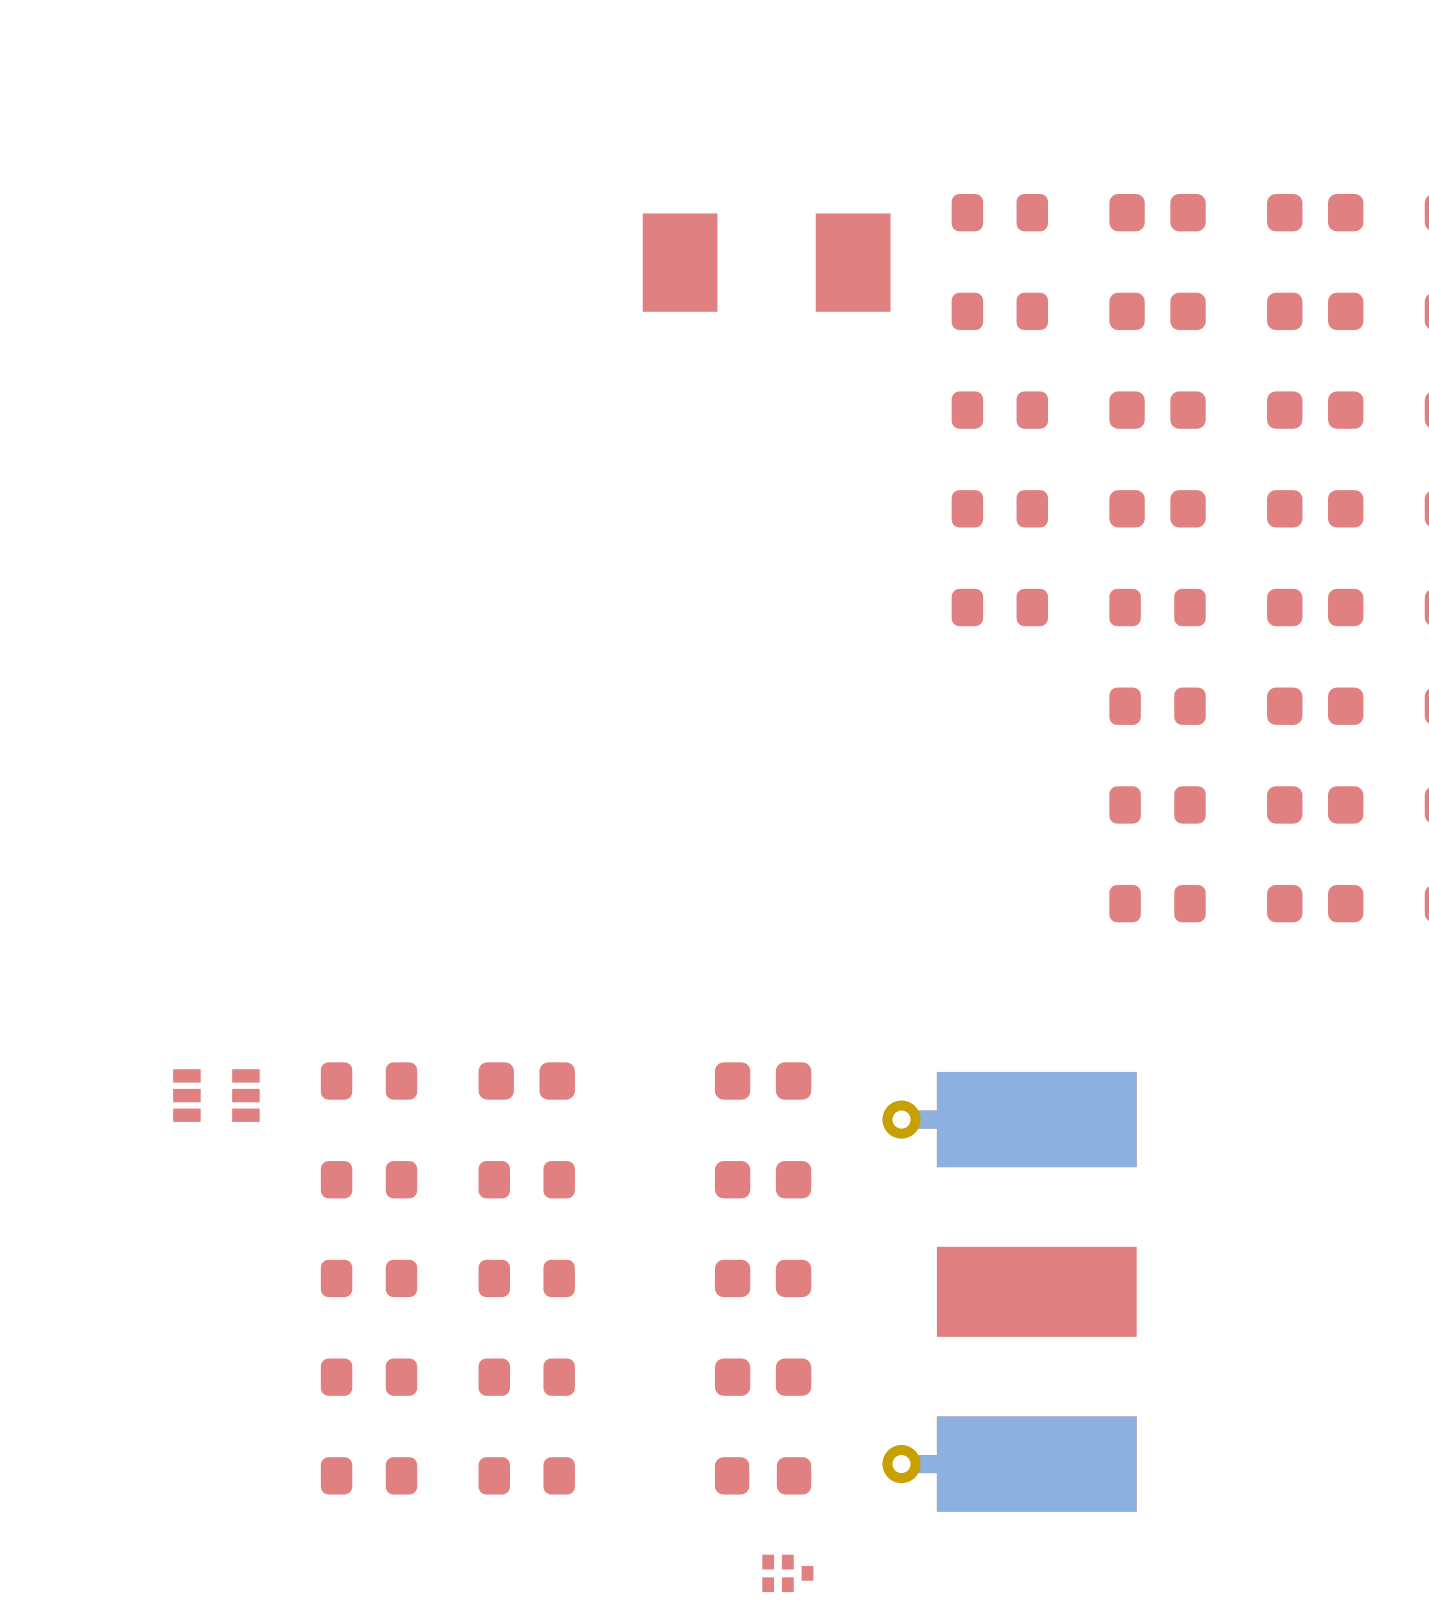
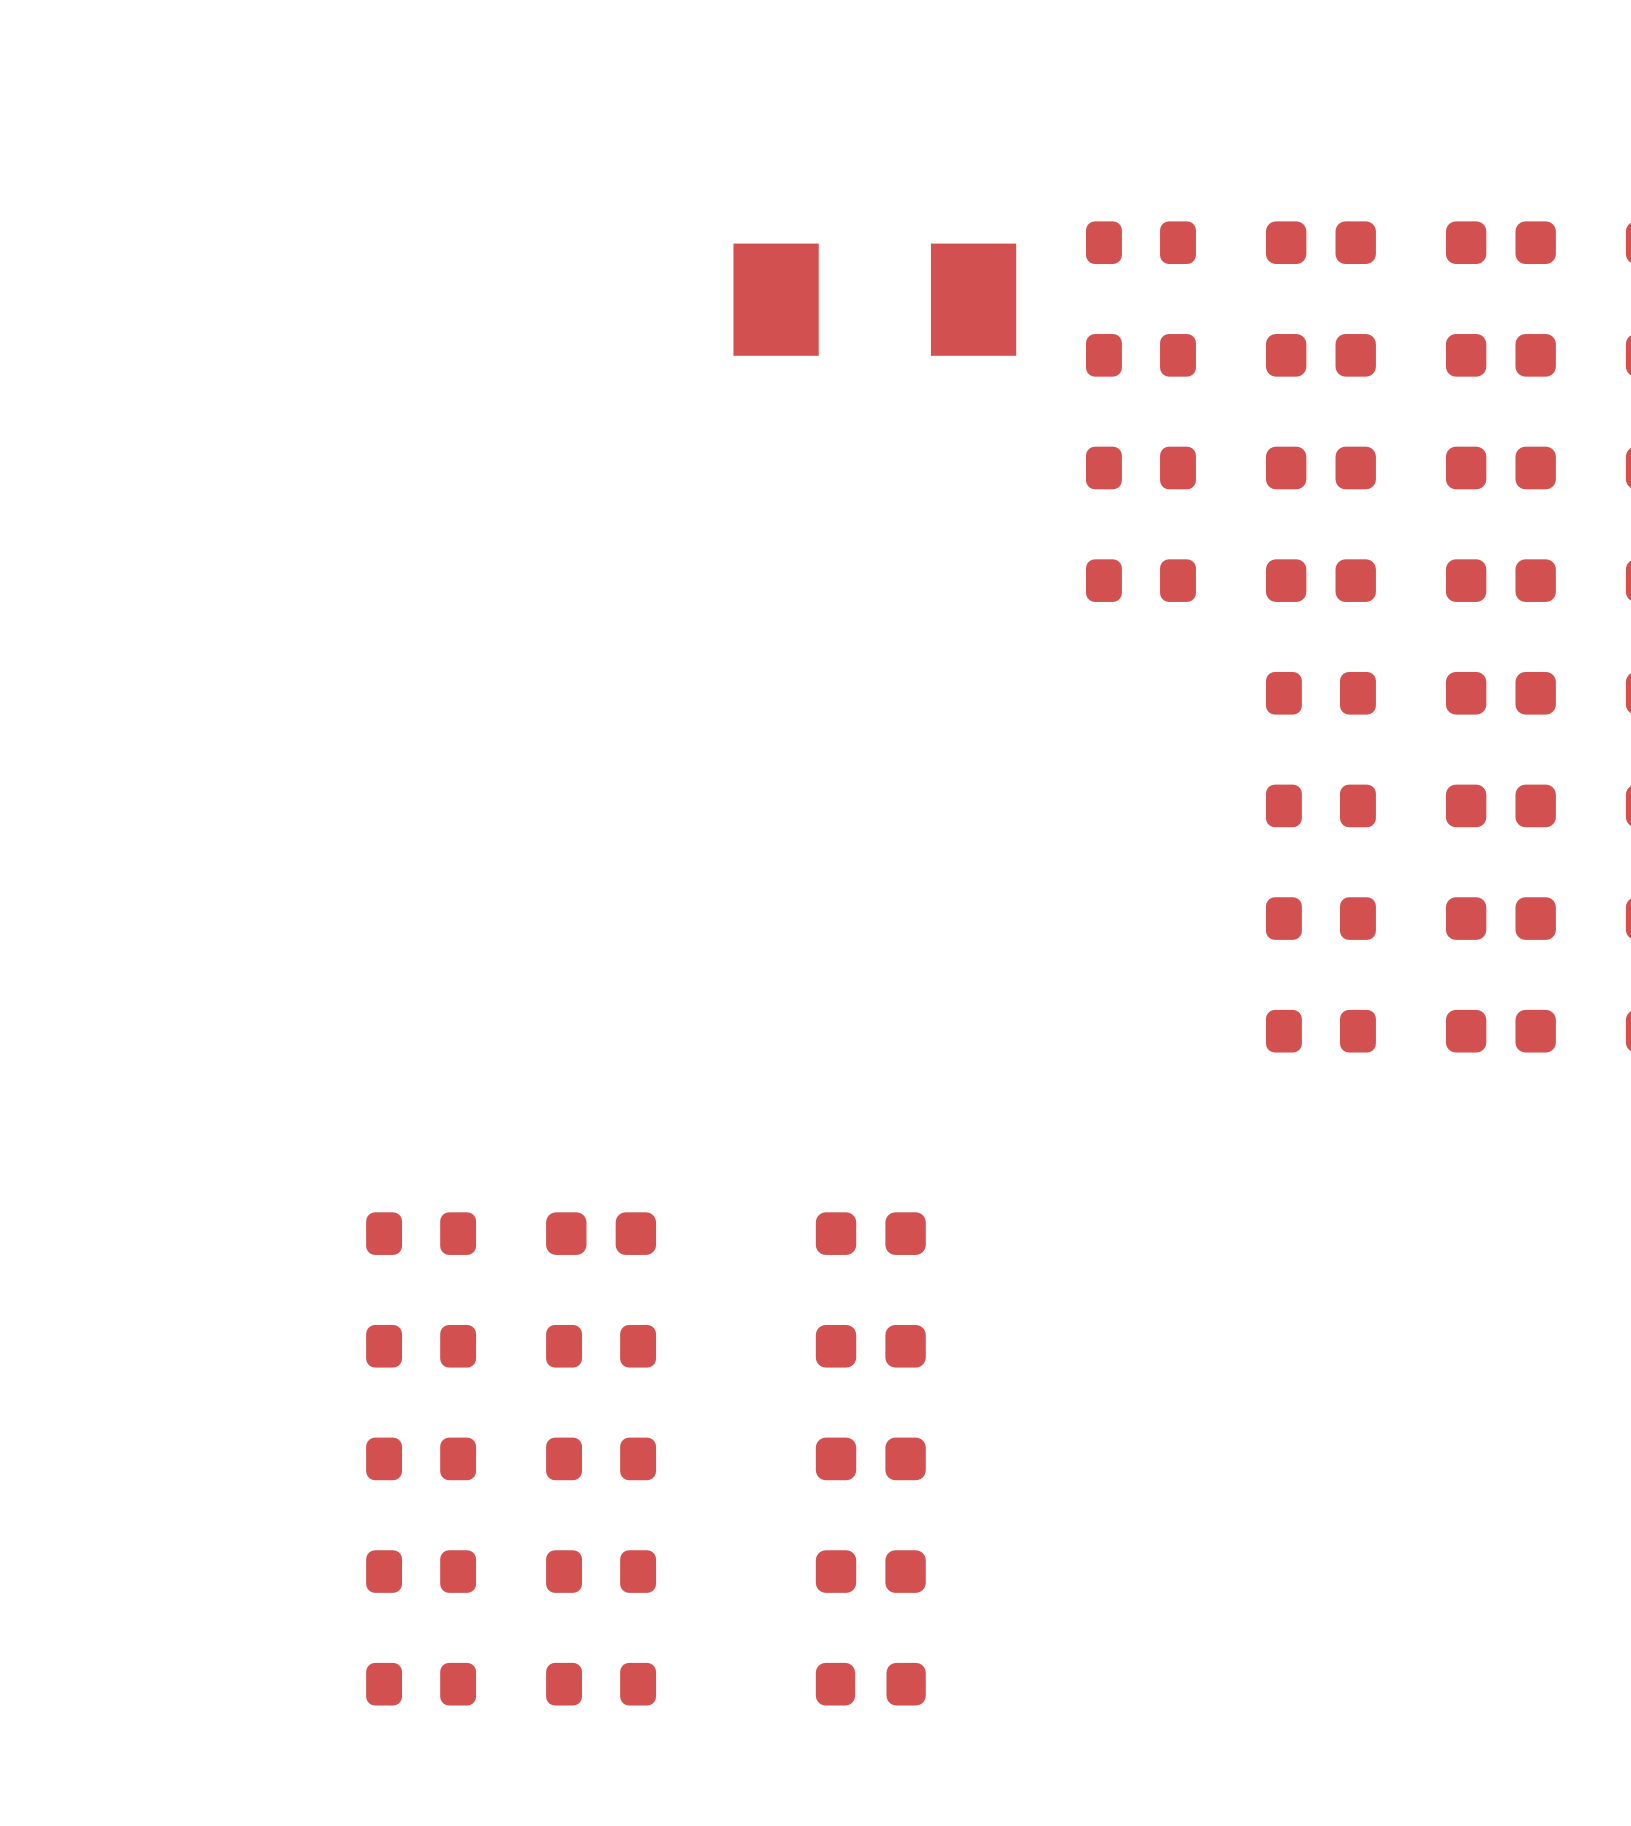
part: (999, 607) -> none
part: (216, 1095) -> none
part: (1009, 1291) -> none
part: (787, 1573) -> none

